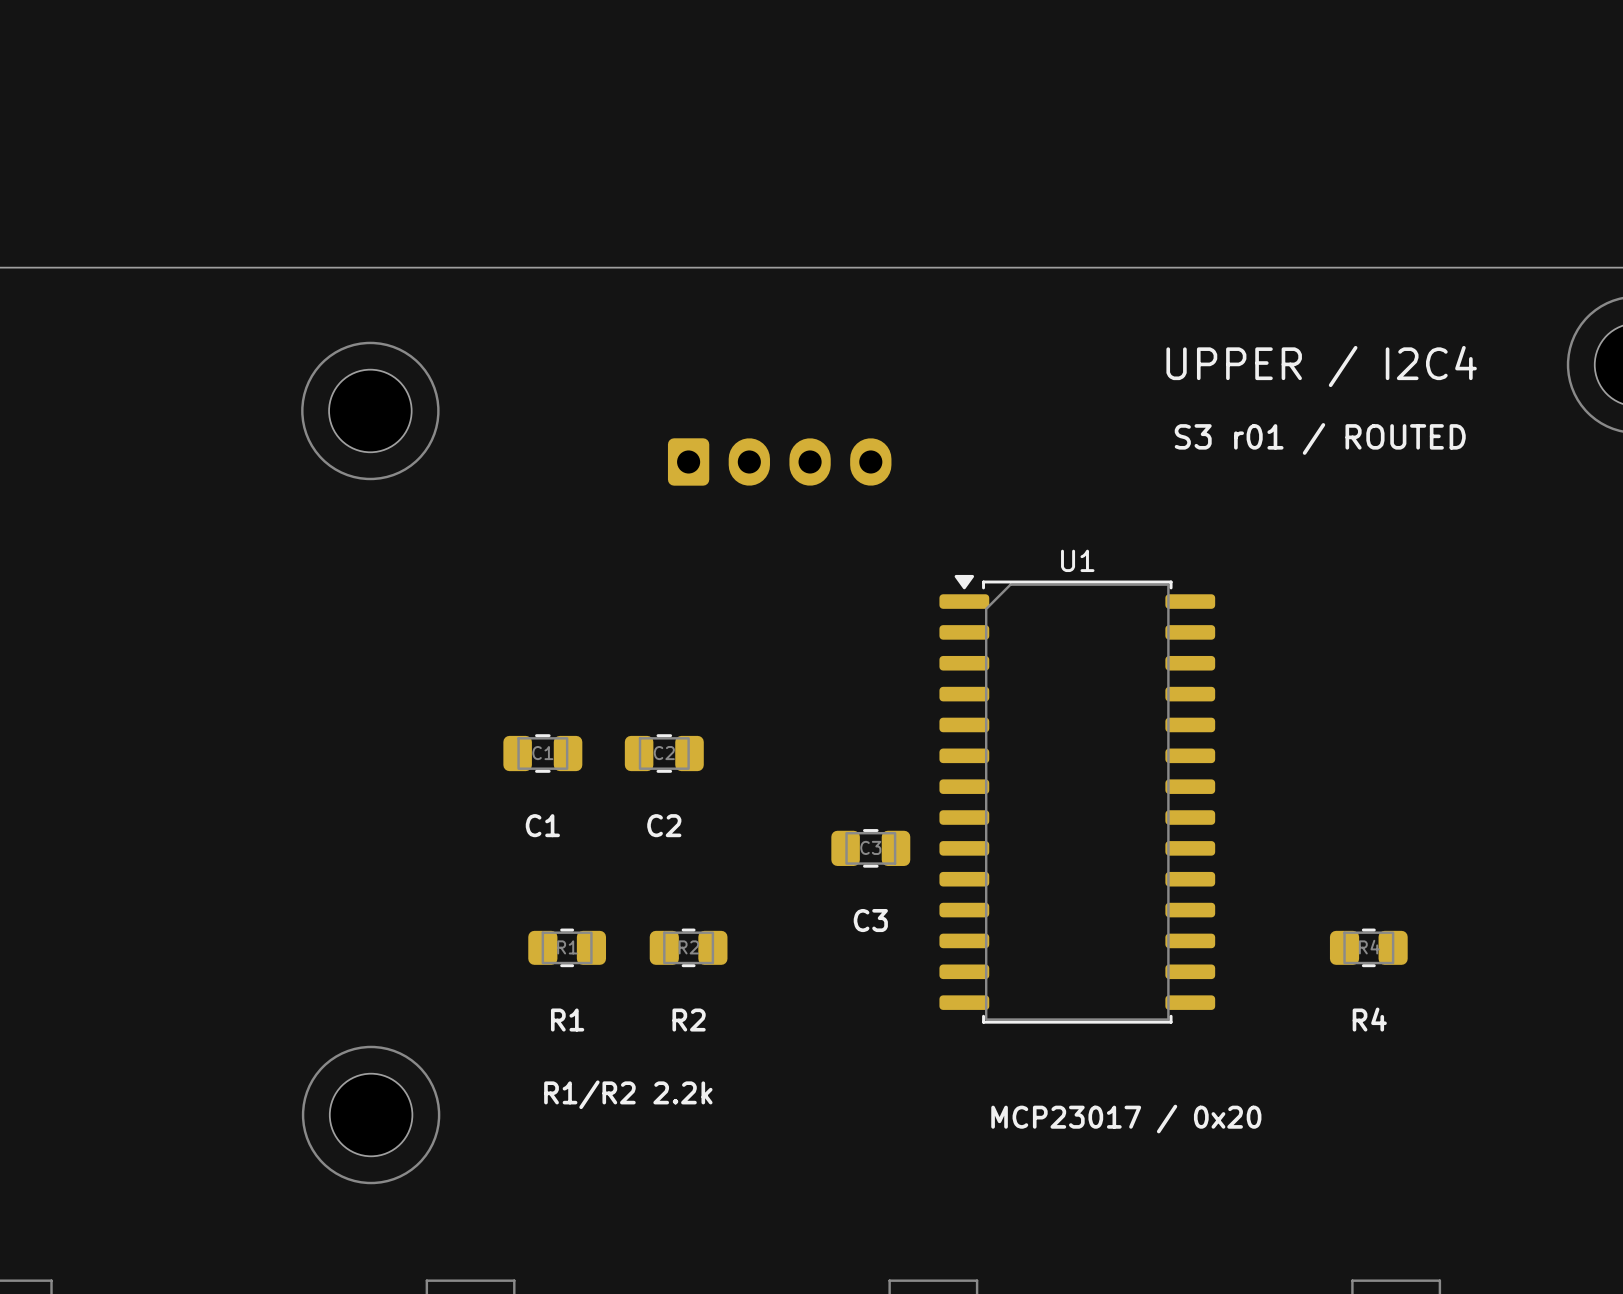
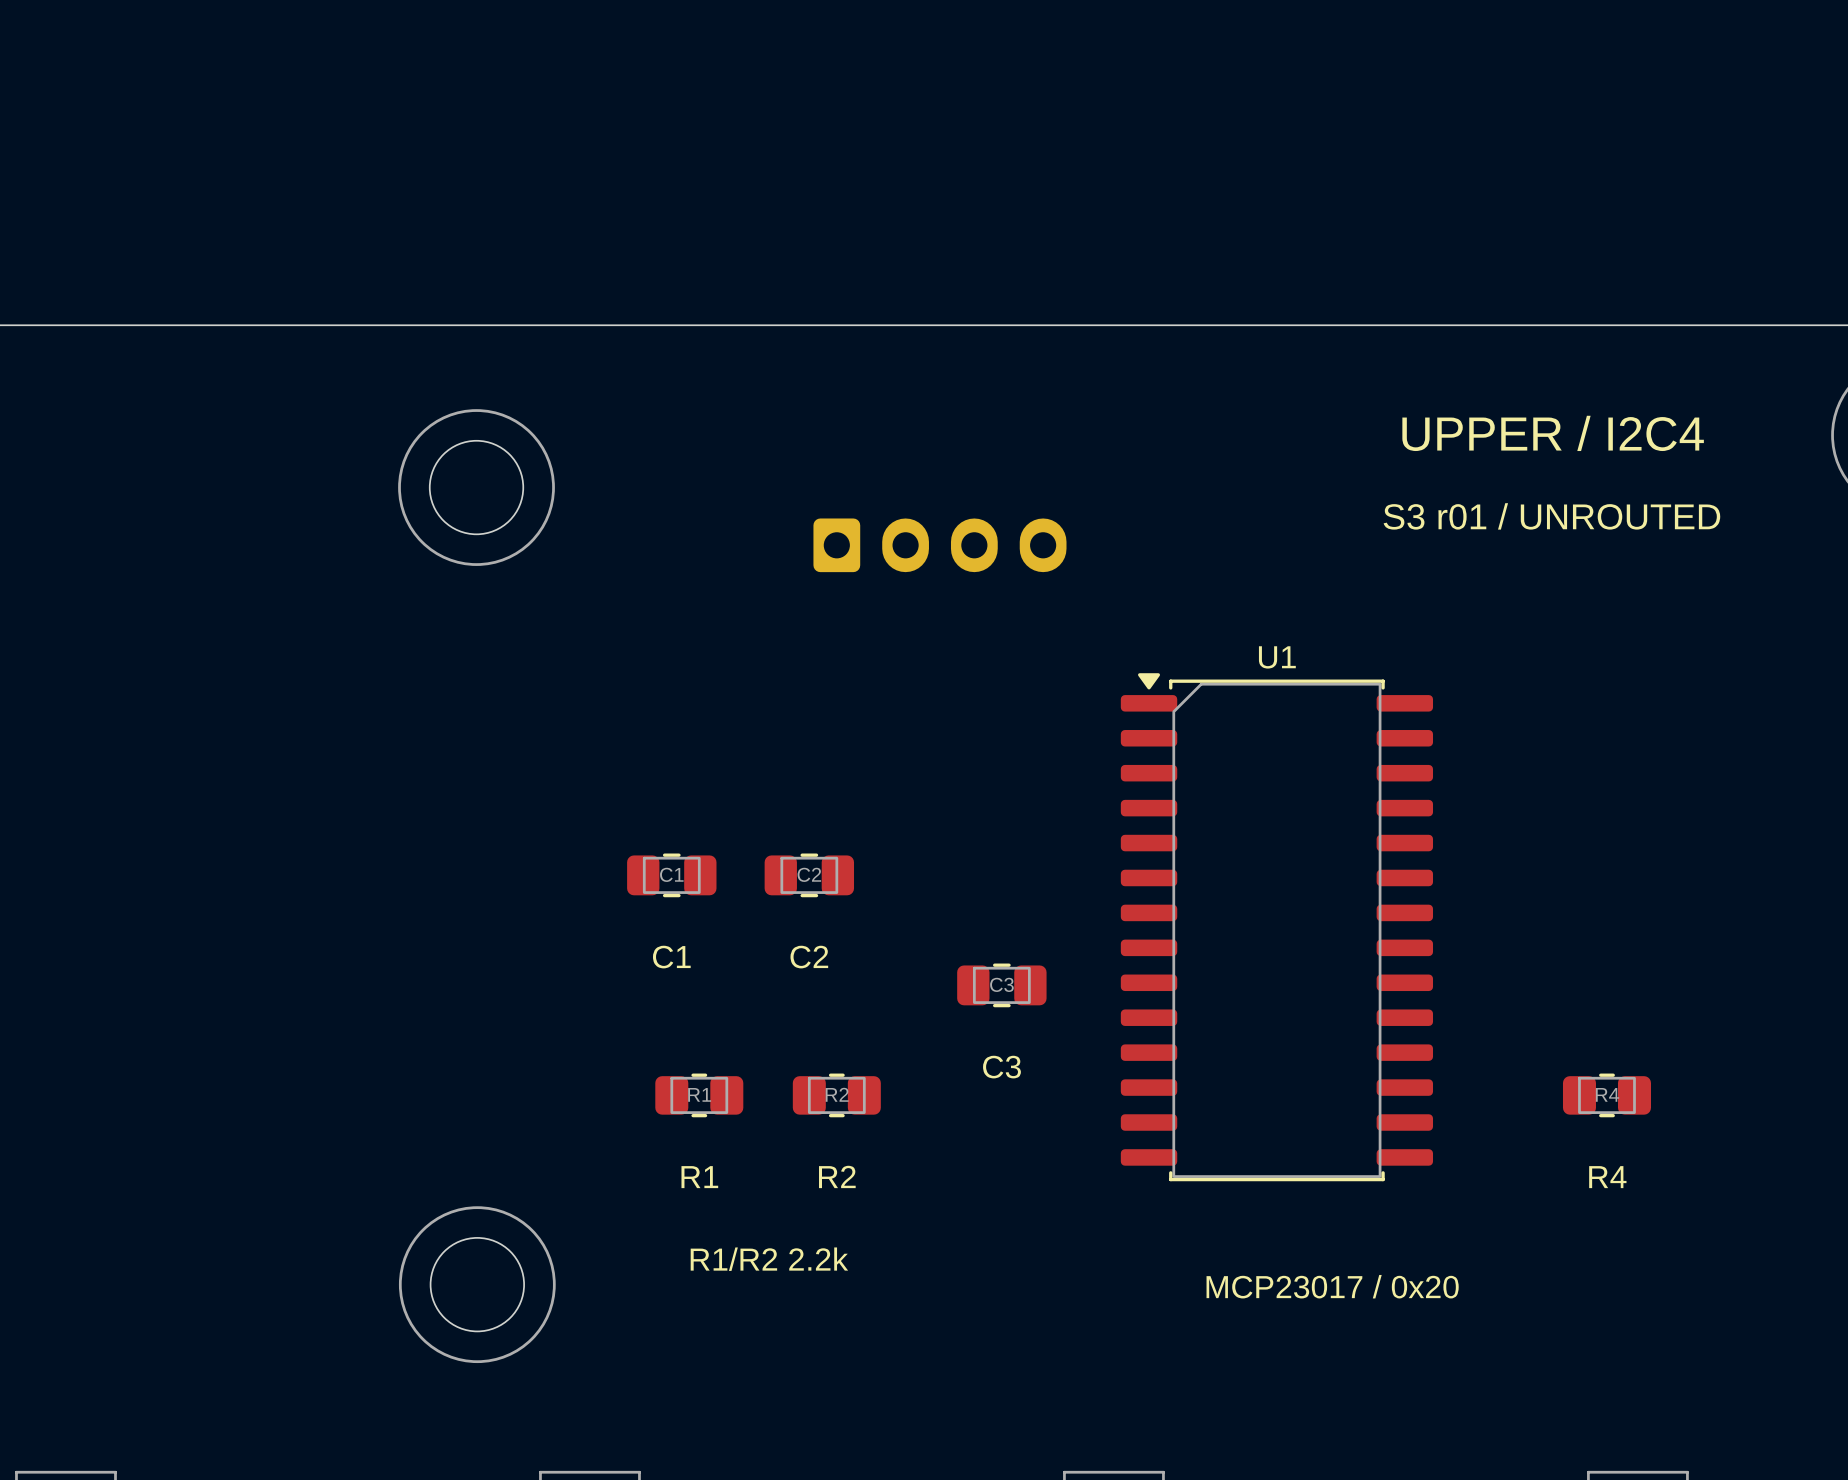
text: S3 r01 / ROUTED (1320, 438) -> S3 r01 / UNROUTED (1551, 516)
C3 position: (870, 848) -> (1001, 985)
text position: C3 (870, 920) -> C3 (1001, 1067)

